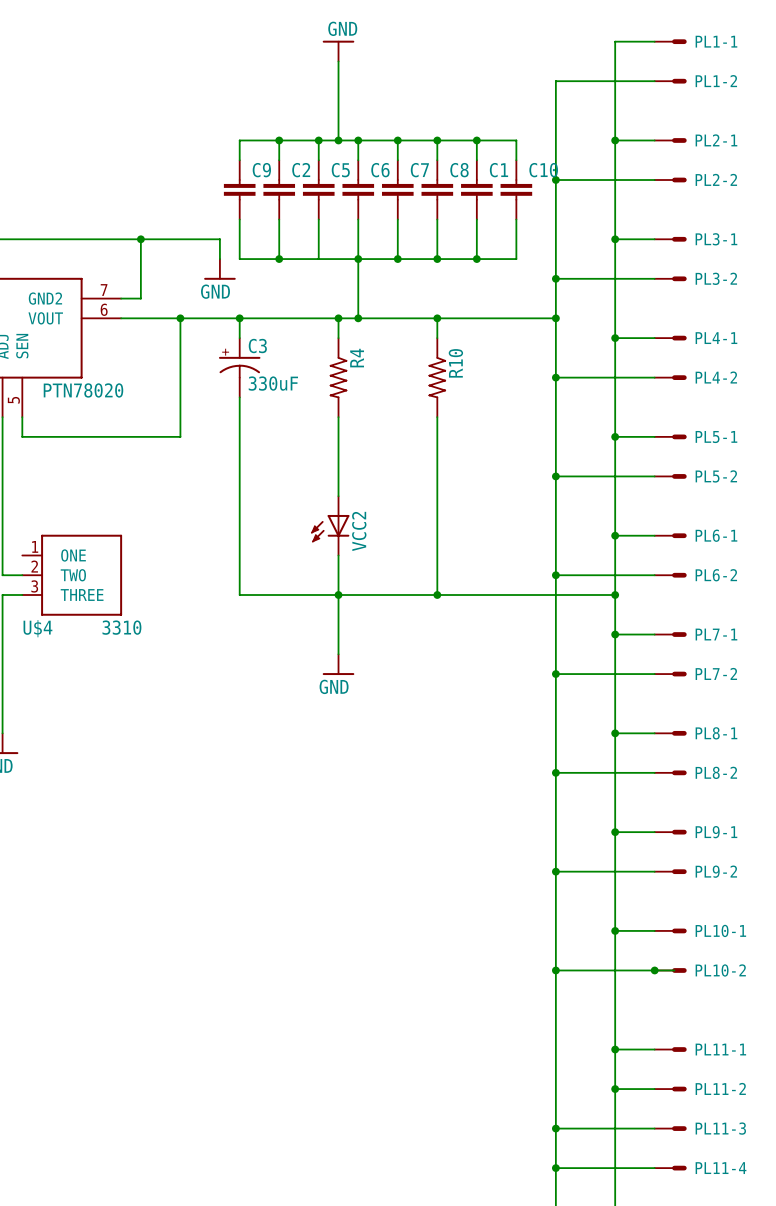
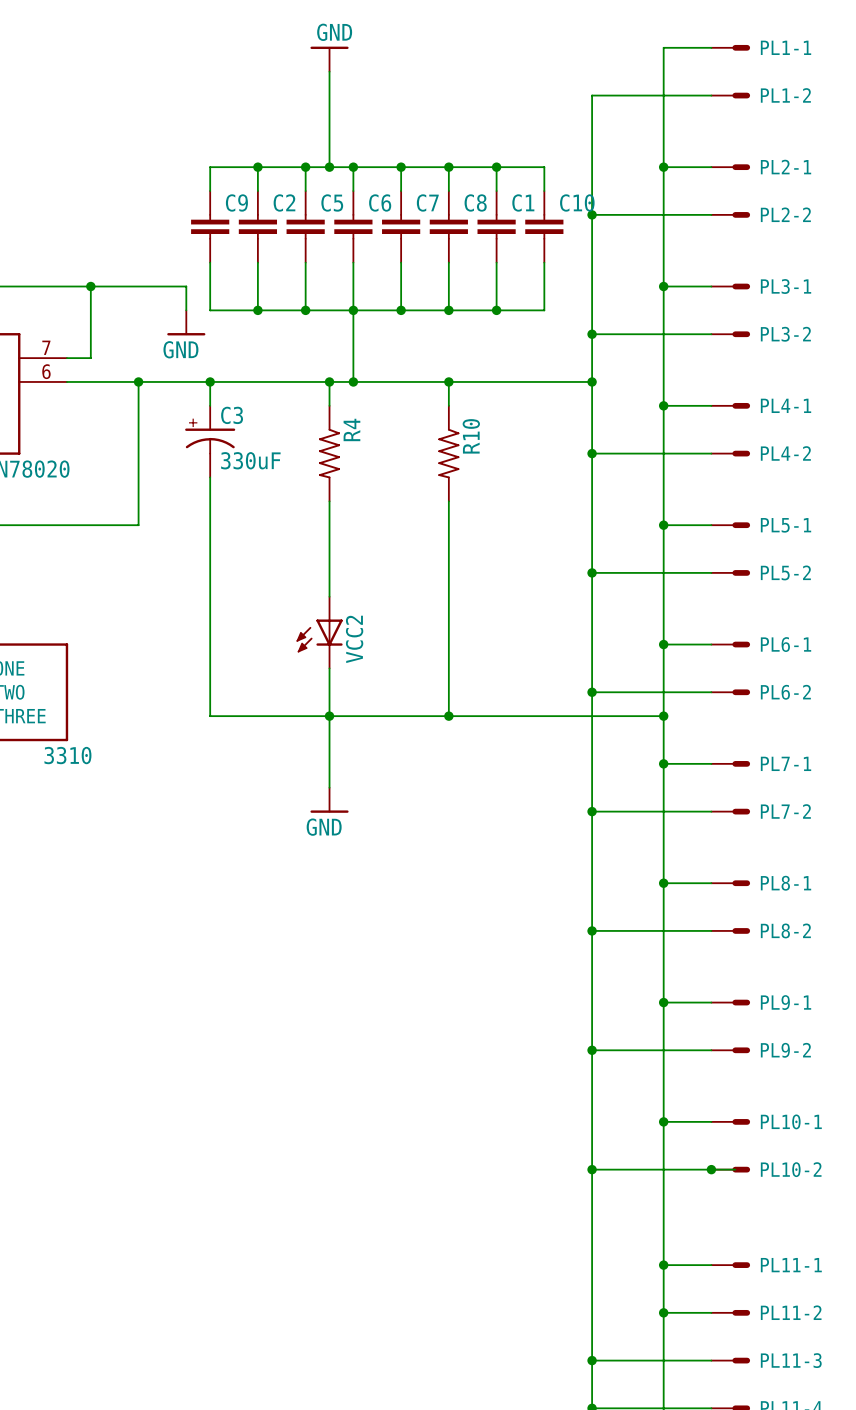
junction: none -> (305, 310)

